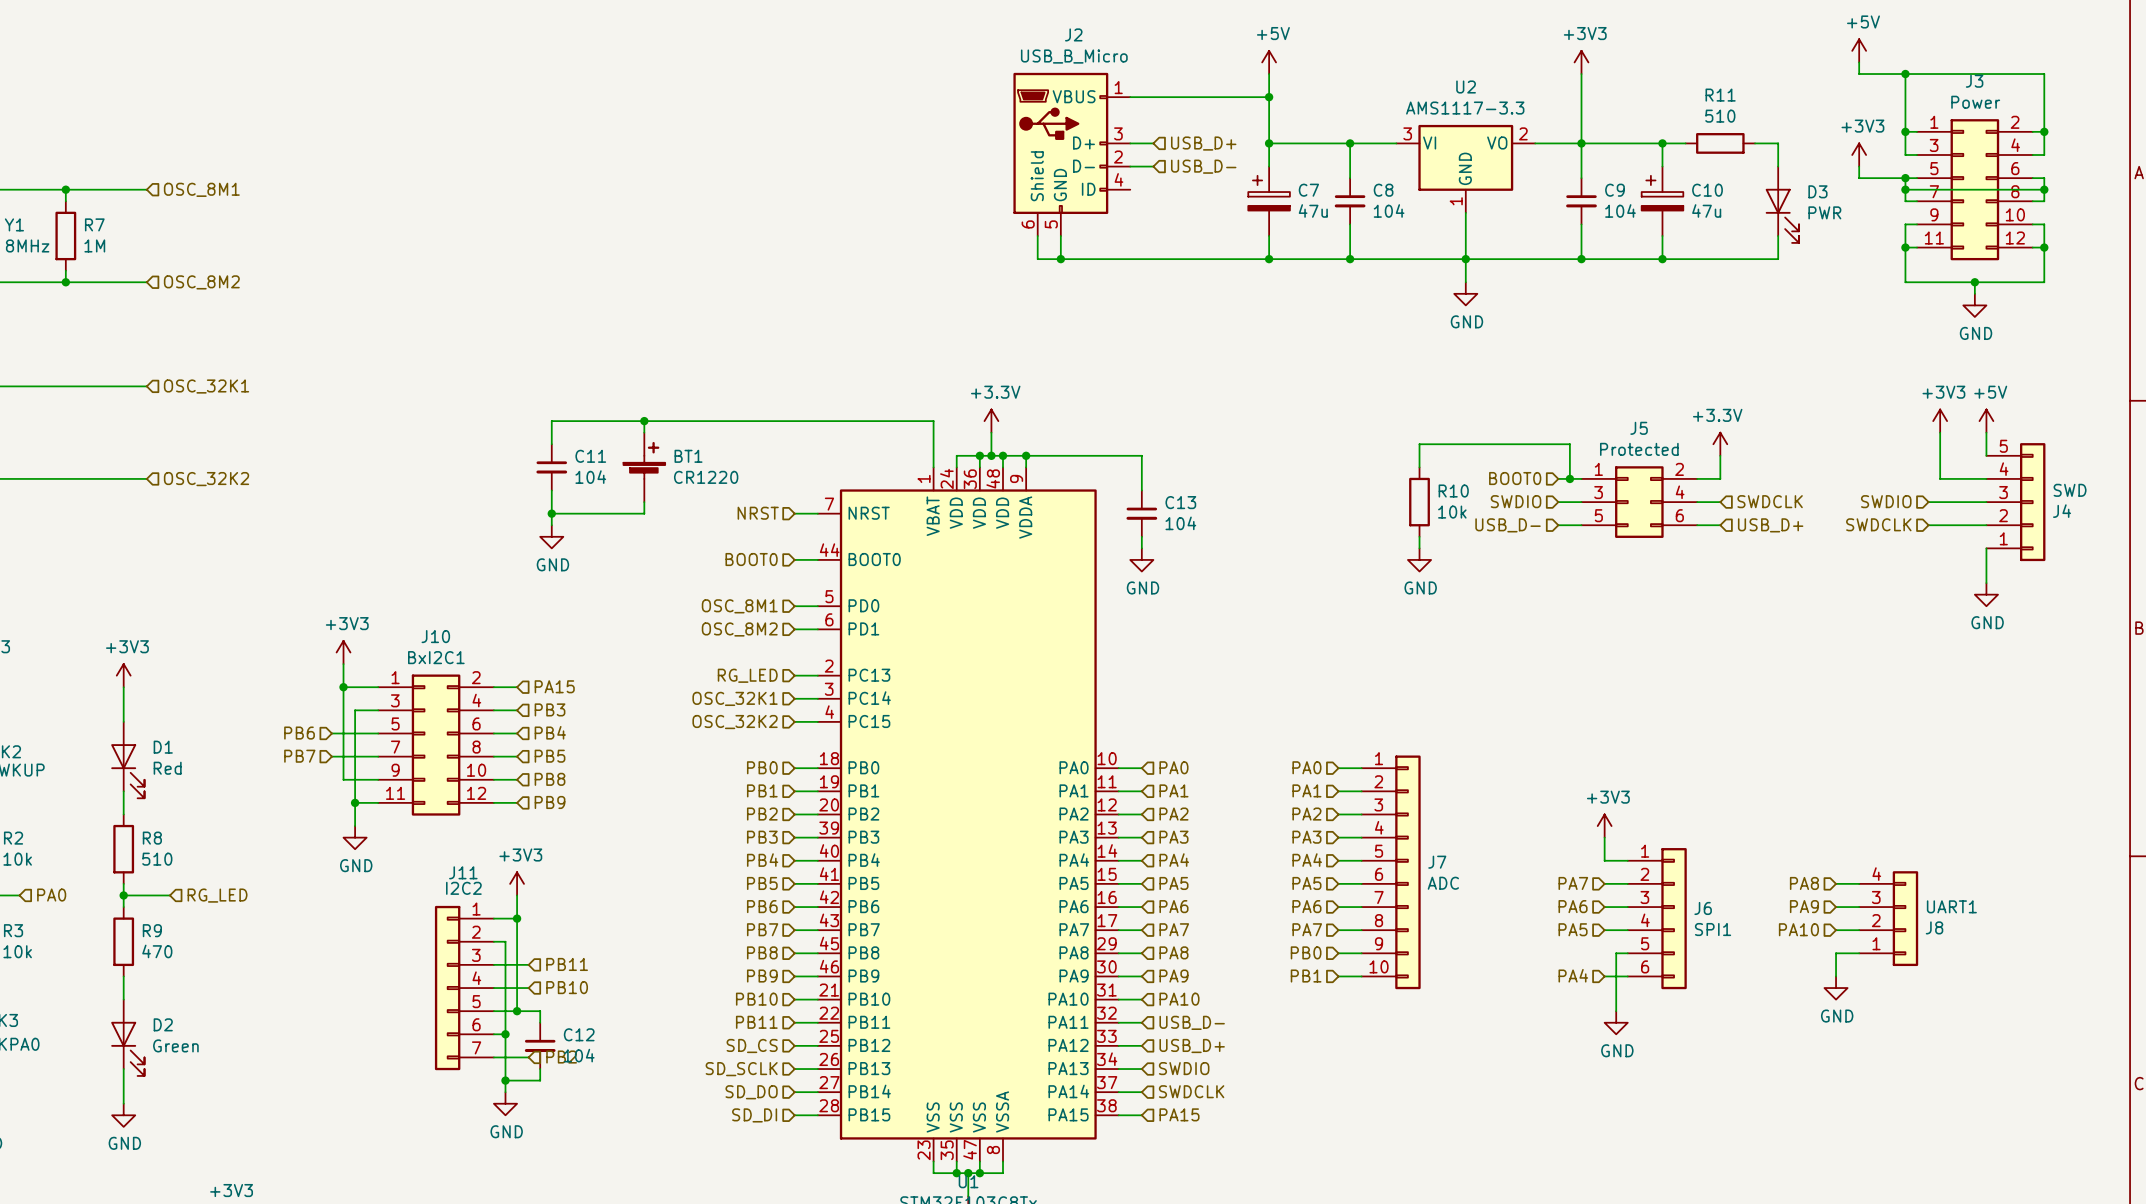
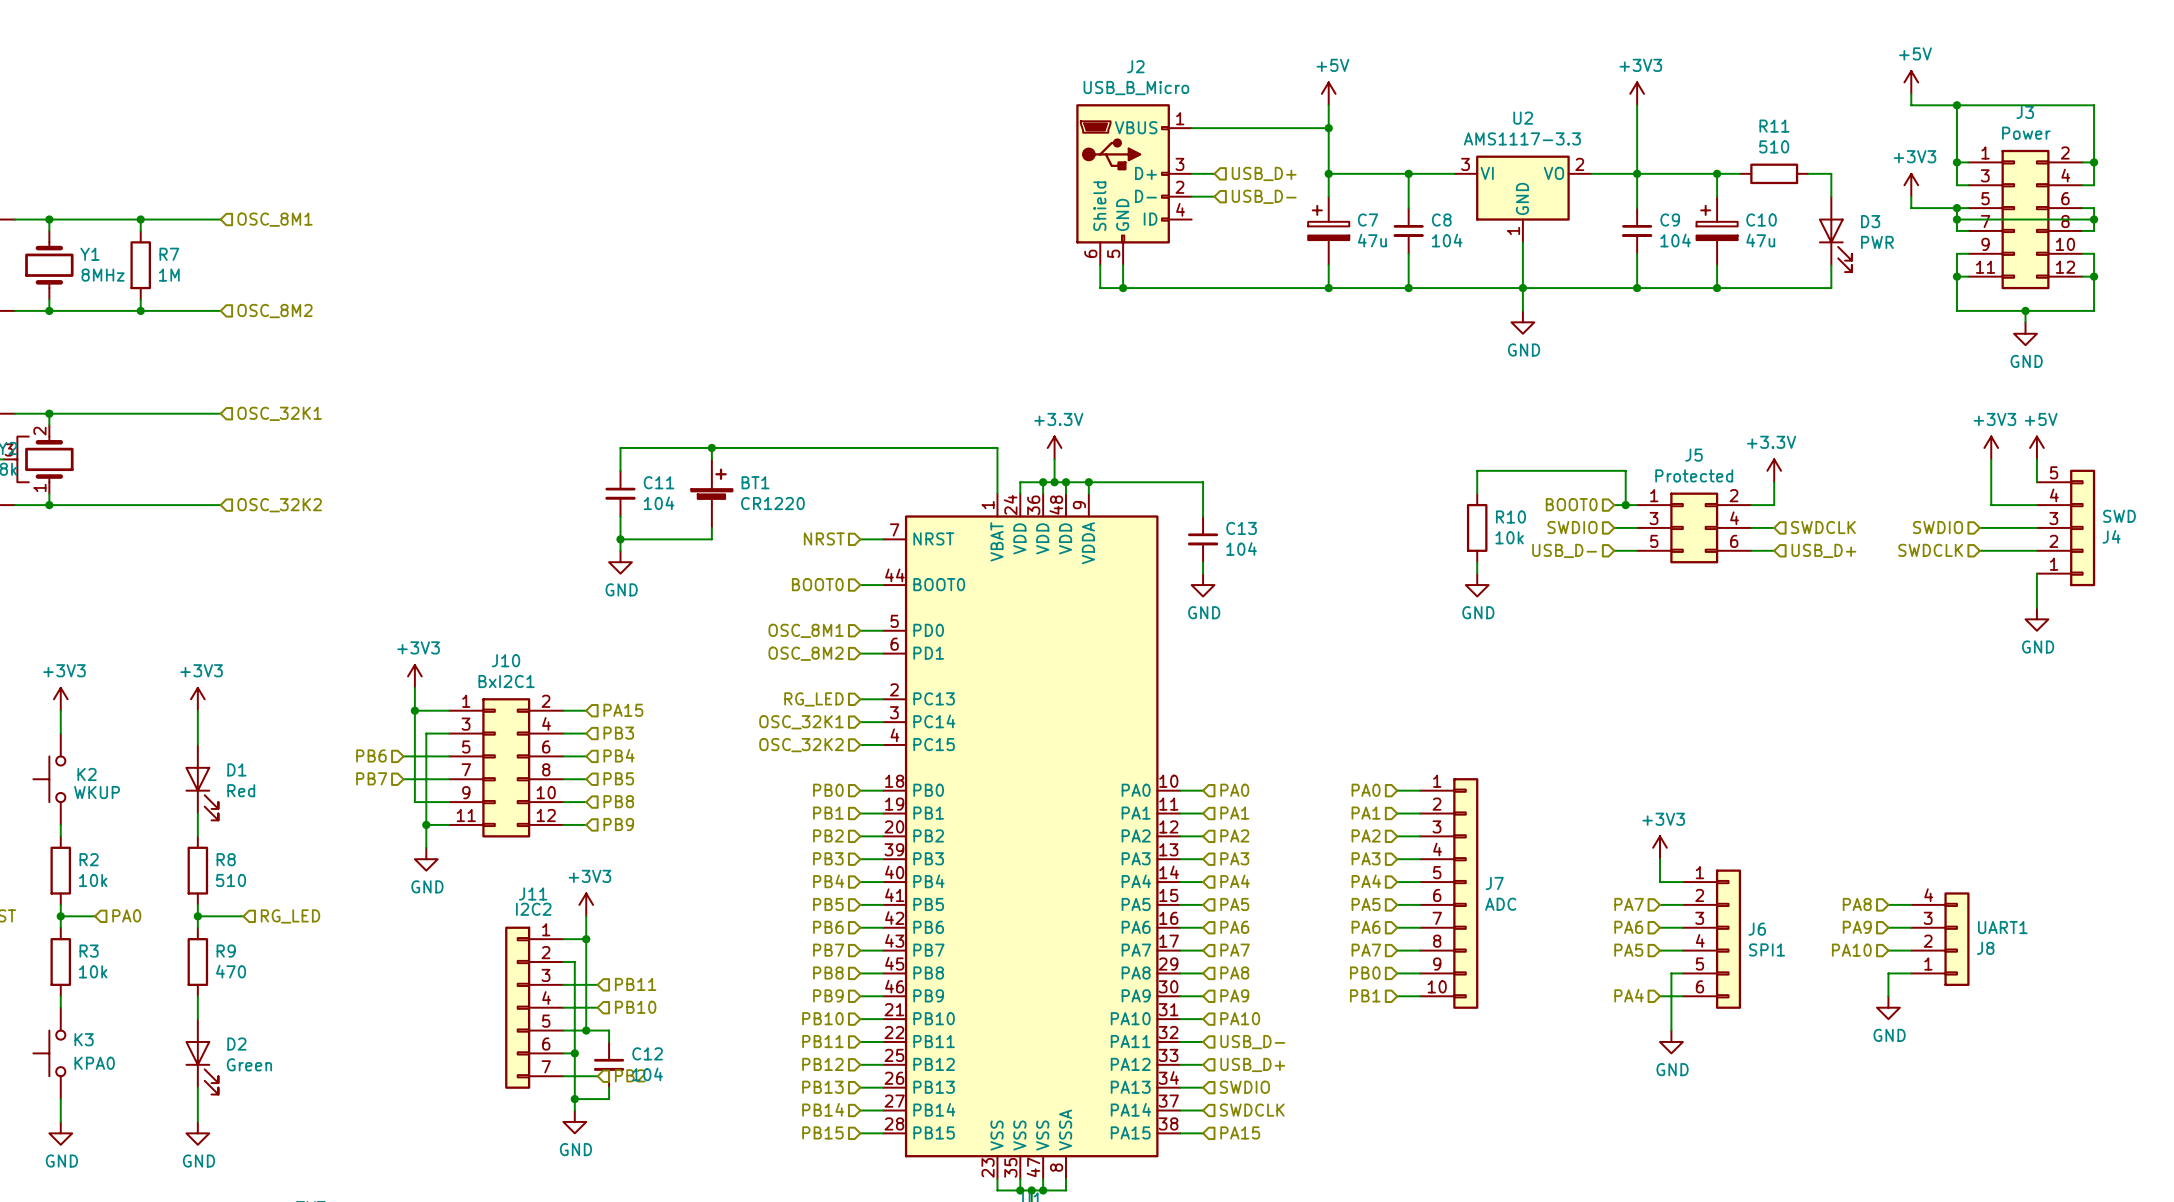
hierarchical label: SD_CS (752, 1046) -> PB12 (822, 1064)
hierarchical label: SD_SCLK (741, 1069) -> PB13 (822, 1087)
hierarchical label: SD_DO (751, 1092) -> PB14 (823, 1109)
hierarchical label: SD_DI (754, 1115) -> PB15 (822, 1132)

